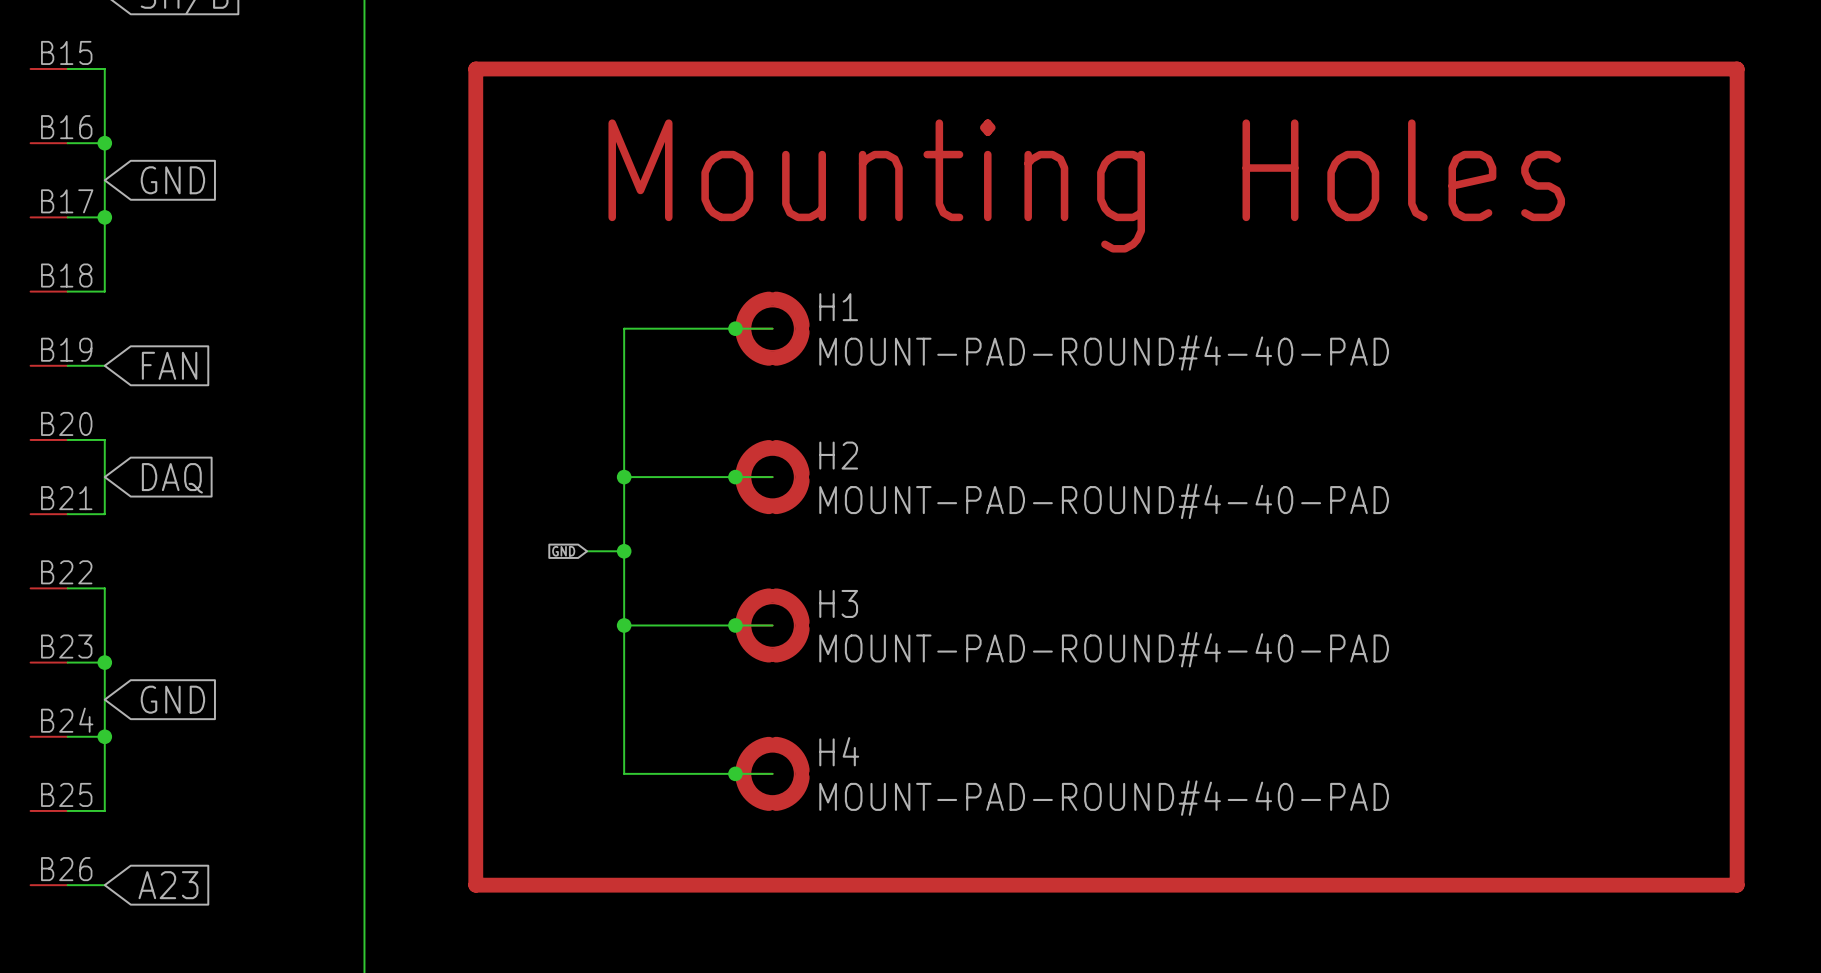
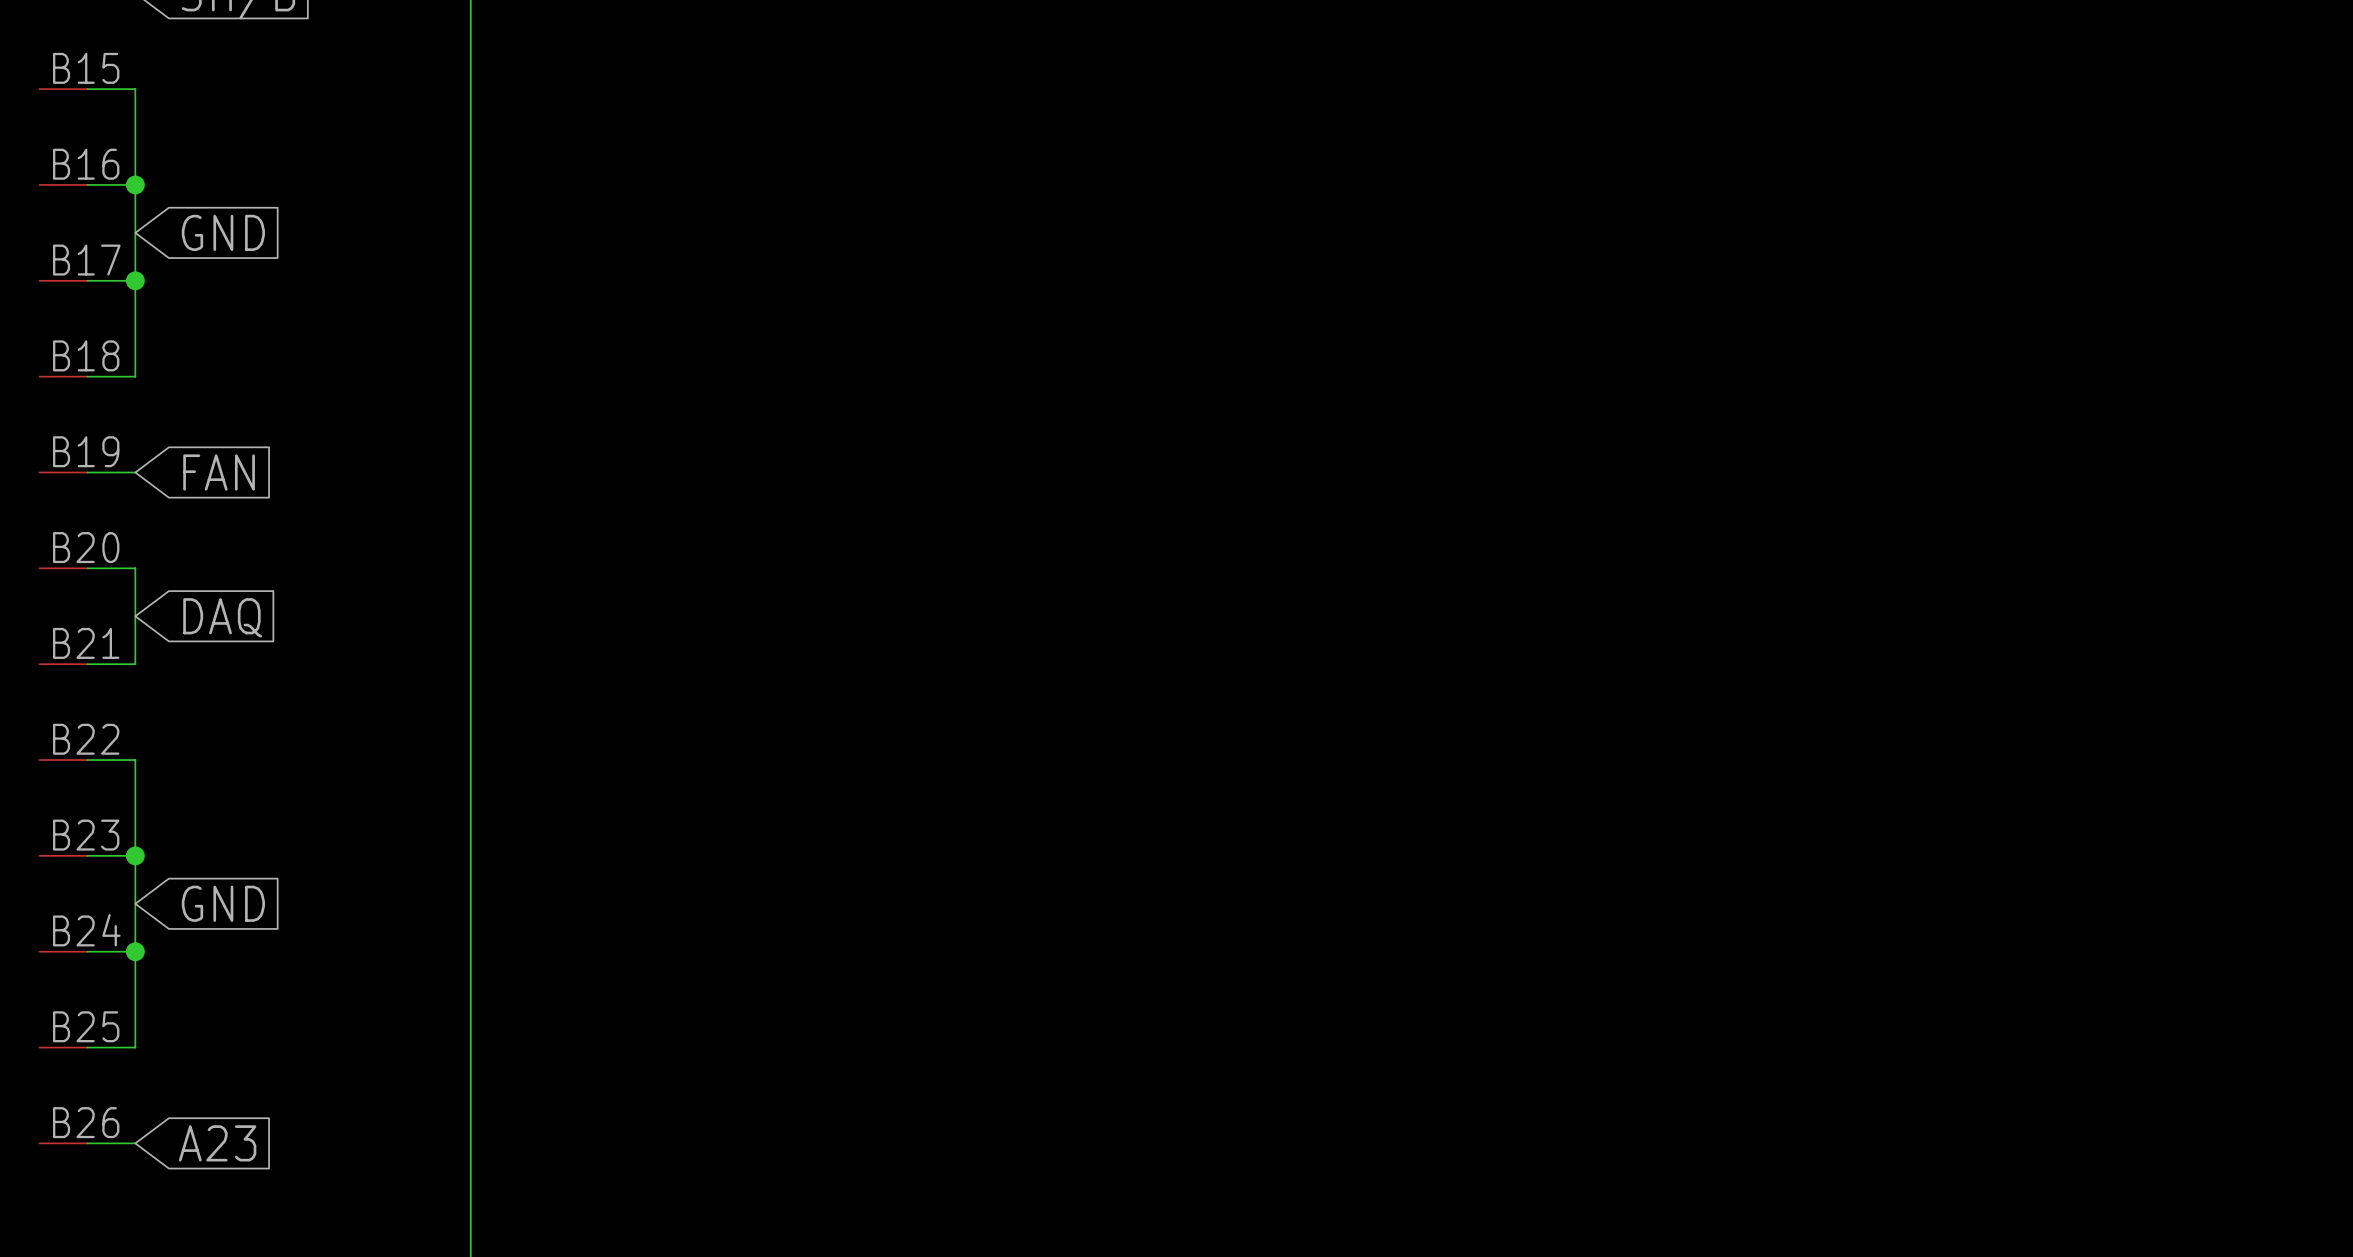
line: (475, 68) (1737, 68) (1737, 885) (475, 885) (475, 68) -> none
text: Mounting Holes (1086, 185) -> none
junction: (735, 328) -> none
wire: (772, 328) (624, 328) (624, 773) (772, 773) -> none
H1: MOUNT-PAD-ROUND#4-40-PAD (772, 328) -> none
wire: (624, 477) (772, 477) -> none
junction: (624, 477) -> none
junction: (735, 477) -> none
H2: MOUNT-PAD-ROUND#4-40-PAD (772, 477) -> none
global label: GND (563, 551) -> none
wire: (587, 551) (624, 551) -> none
junction: (624, 551) -> none
wire: (624, 625) (772, 625) -> none
junction: (624, 625) -> none
junction: (735, 625) -> none
H3: MOUNT-PAD-ROUND#4-40-PAD (772, 625) -> none
junction: (735, 773) -> none
H4: MOUNT-PAD-ROUND#4-40-PAD (772, 773) -> none

